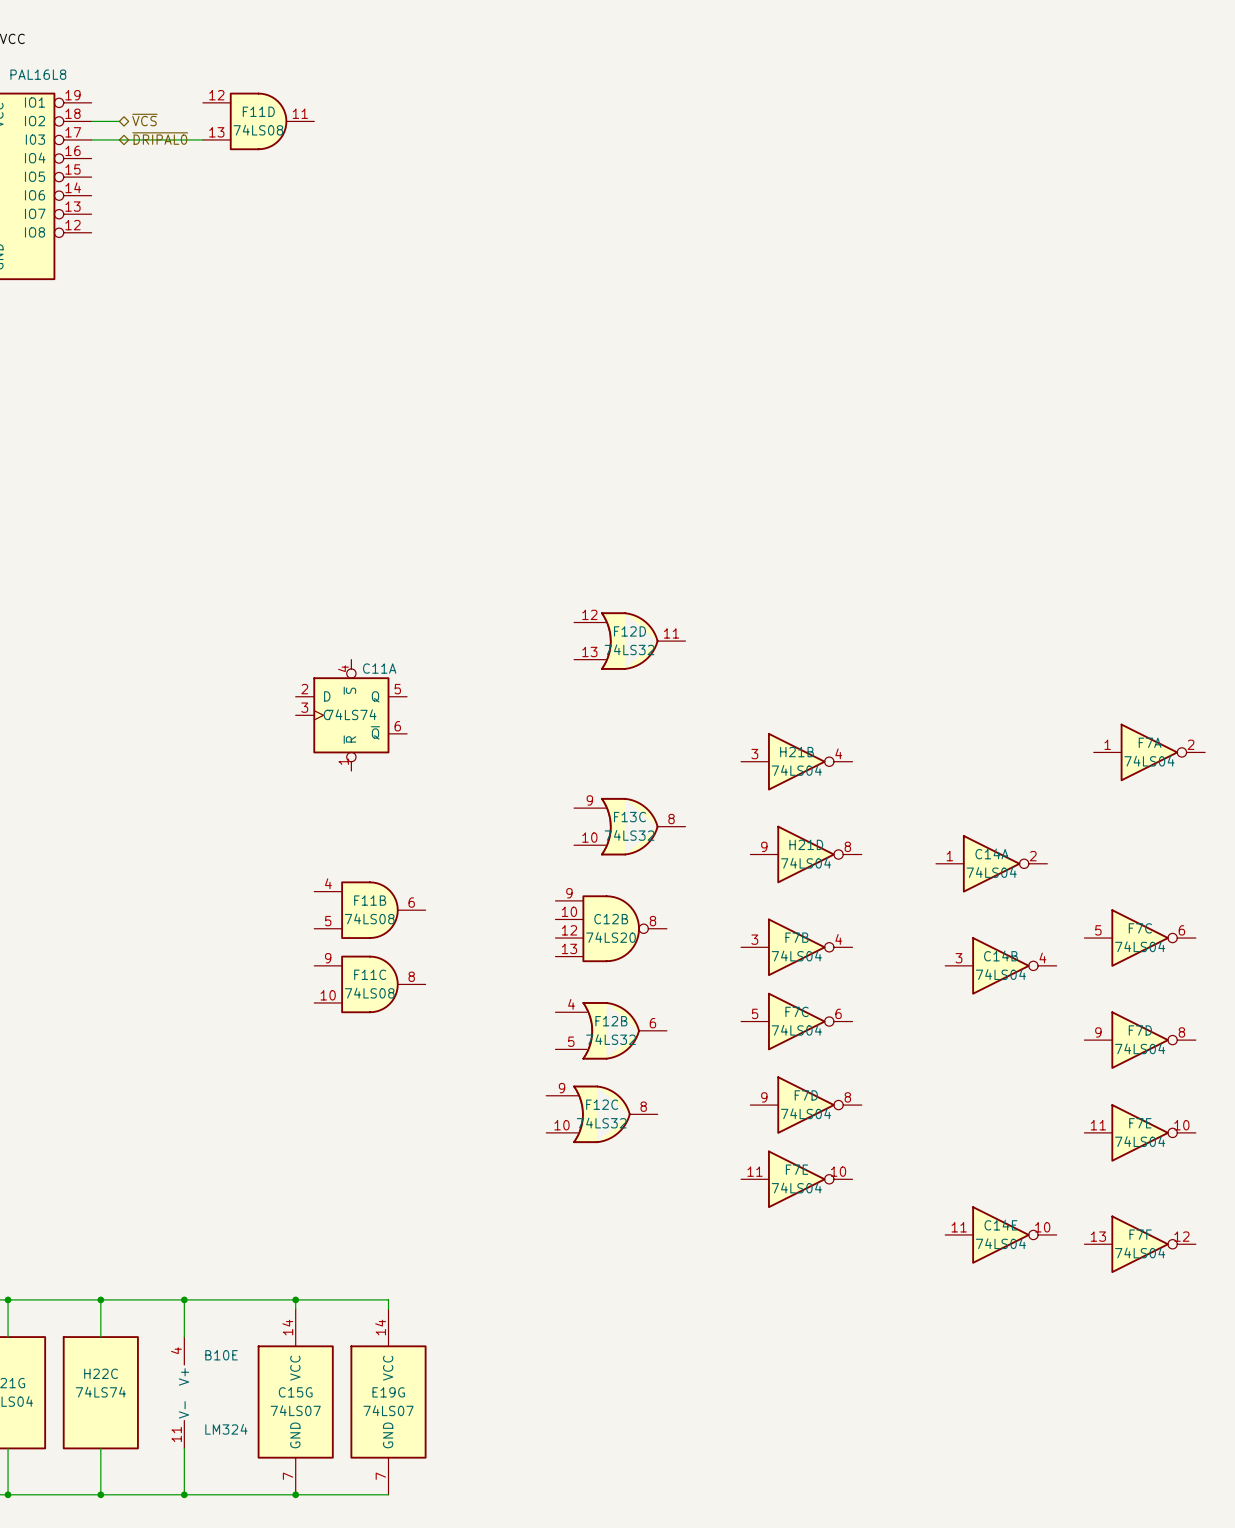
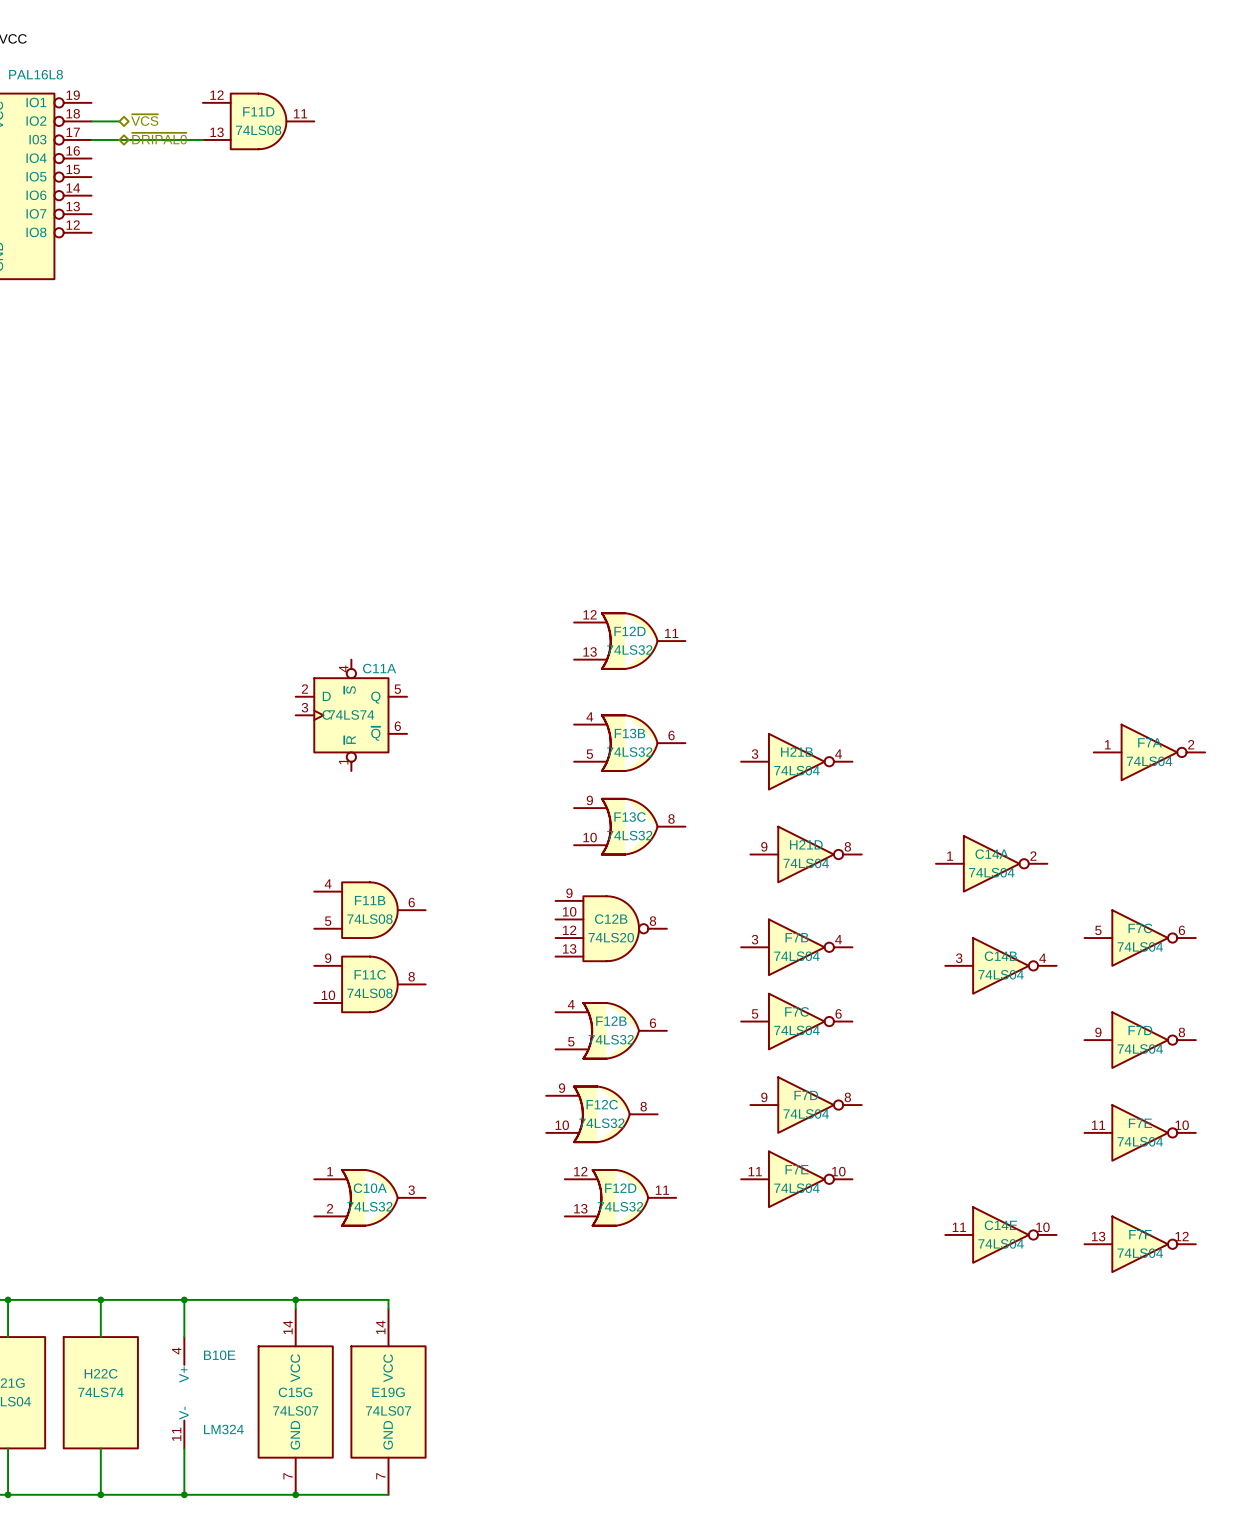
F13B: none -> 74LS32 (629, 743)
C10A: none -> 74LS32 (369, 1197)
F12D: none -> 74LS32 (620, 1197)

